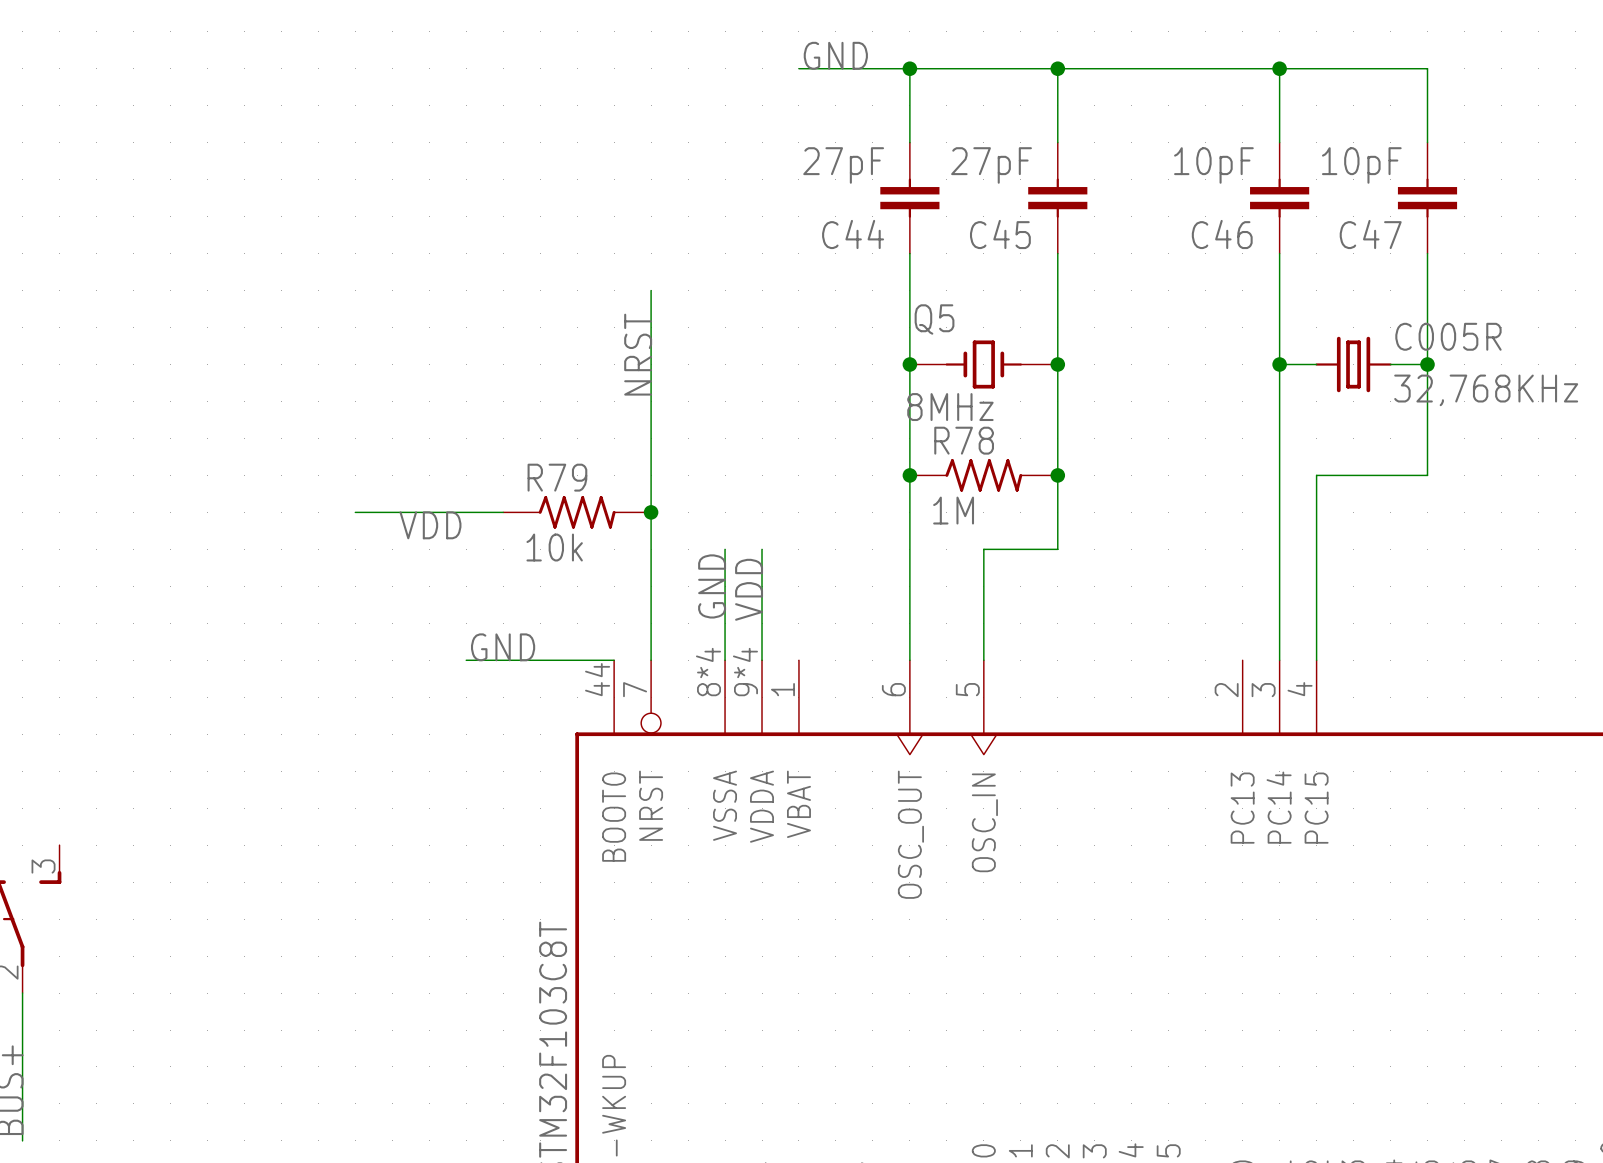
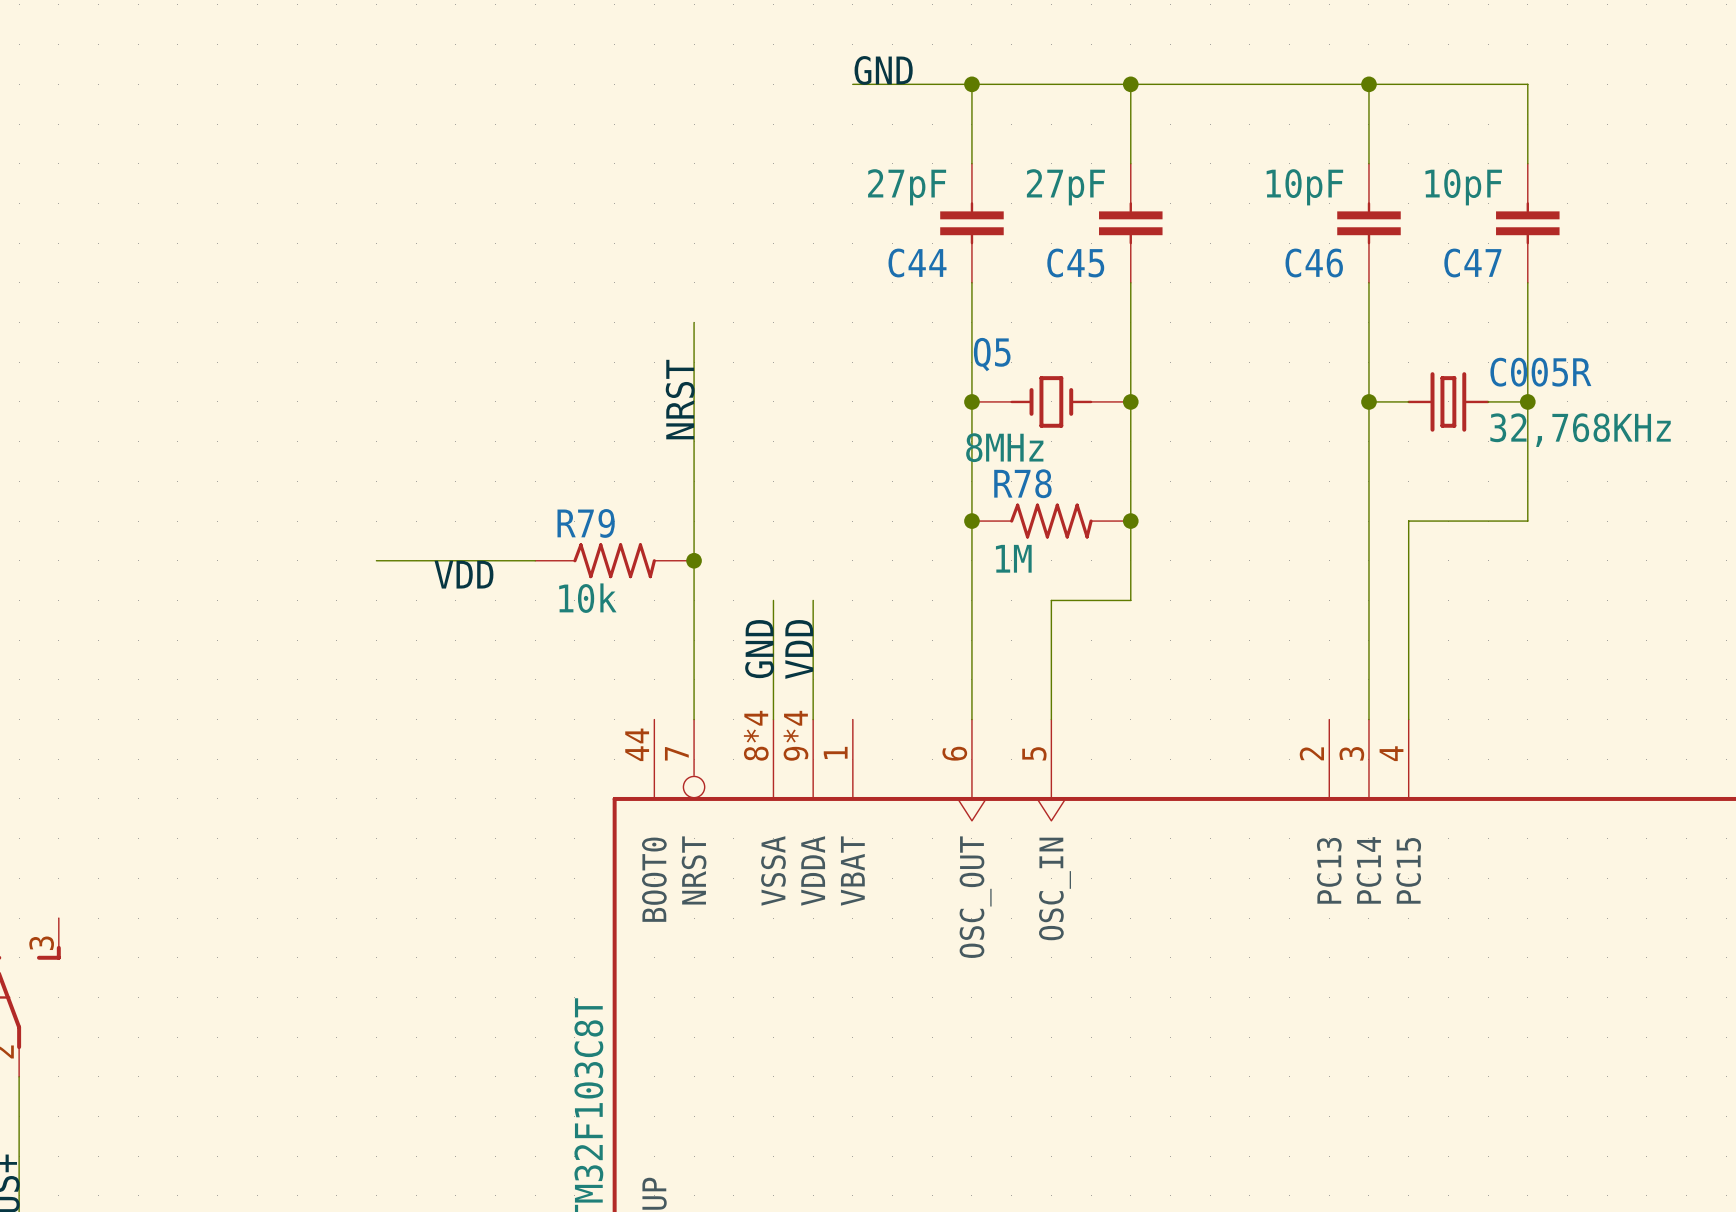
label: GND (503, 647) -> none
wire: (466, 660) (614, 660) -> none

